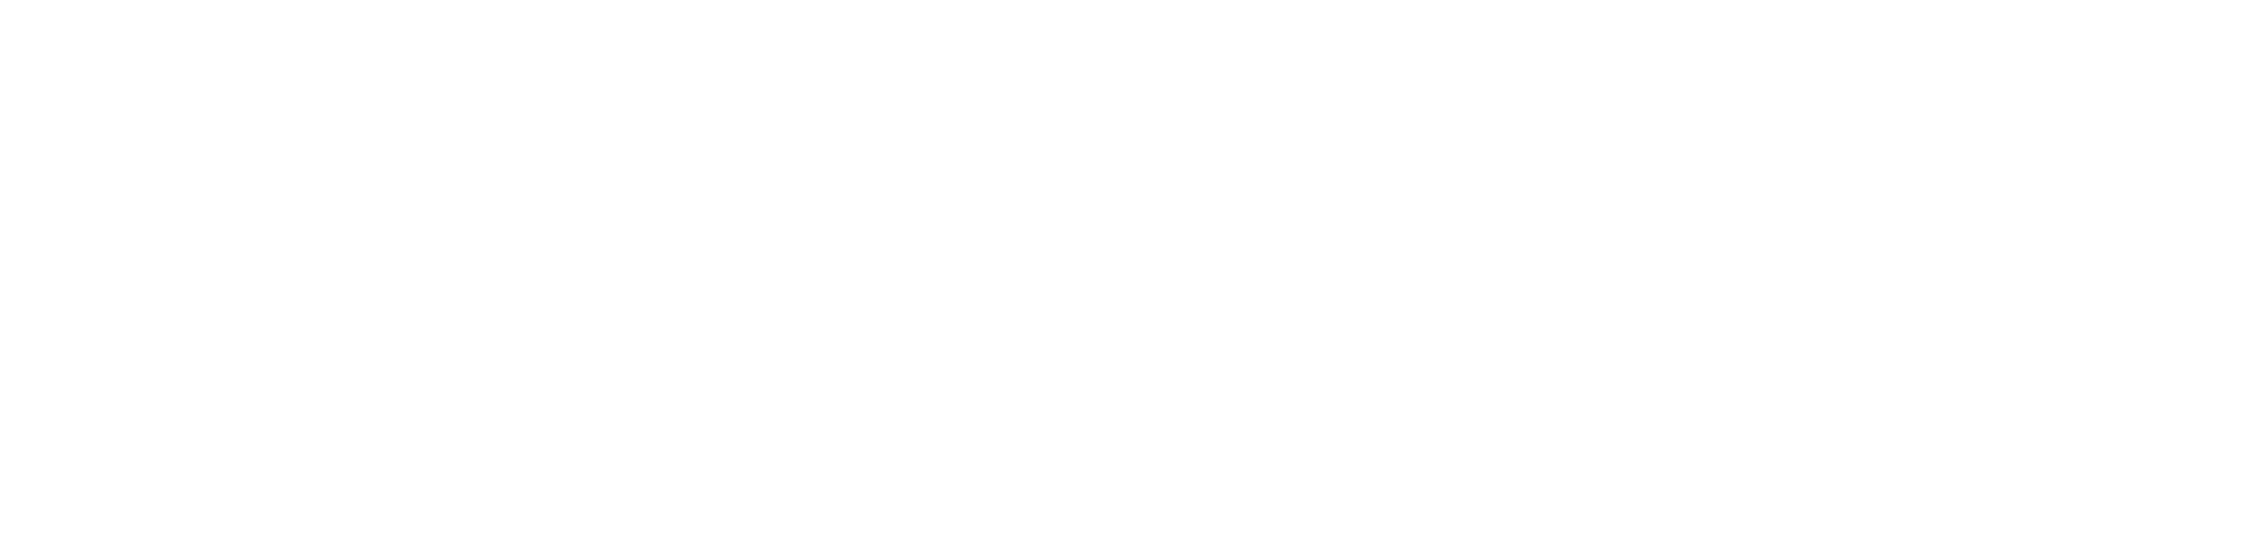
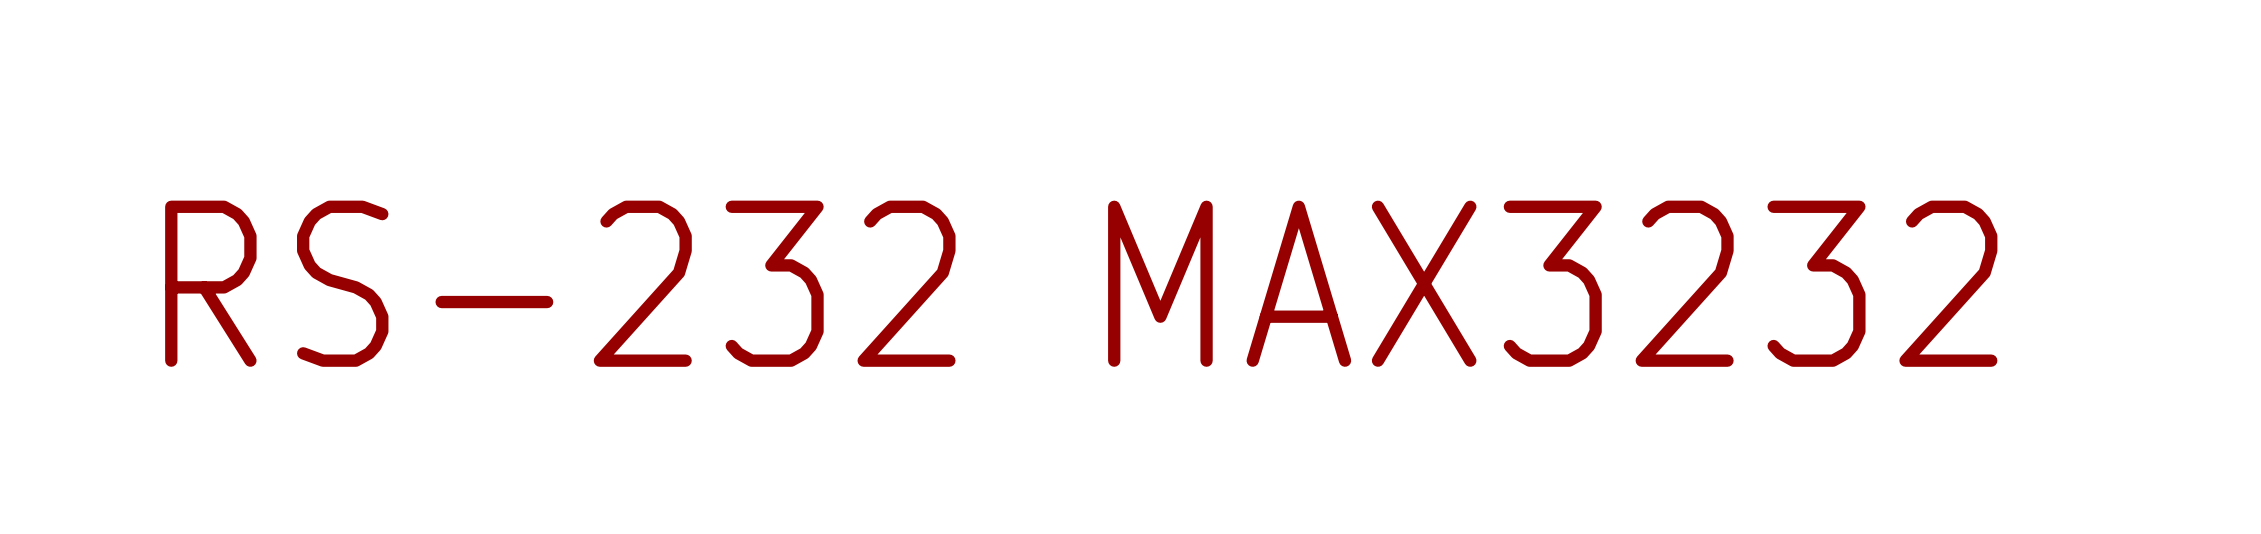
text: none -> RS-232 MAX3232 (1081, 283)

